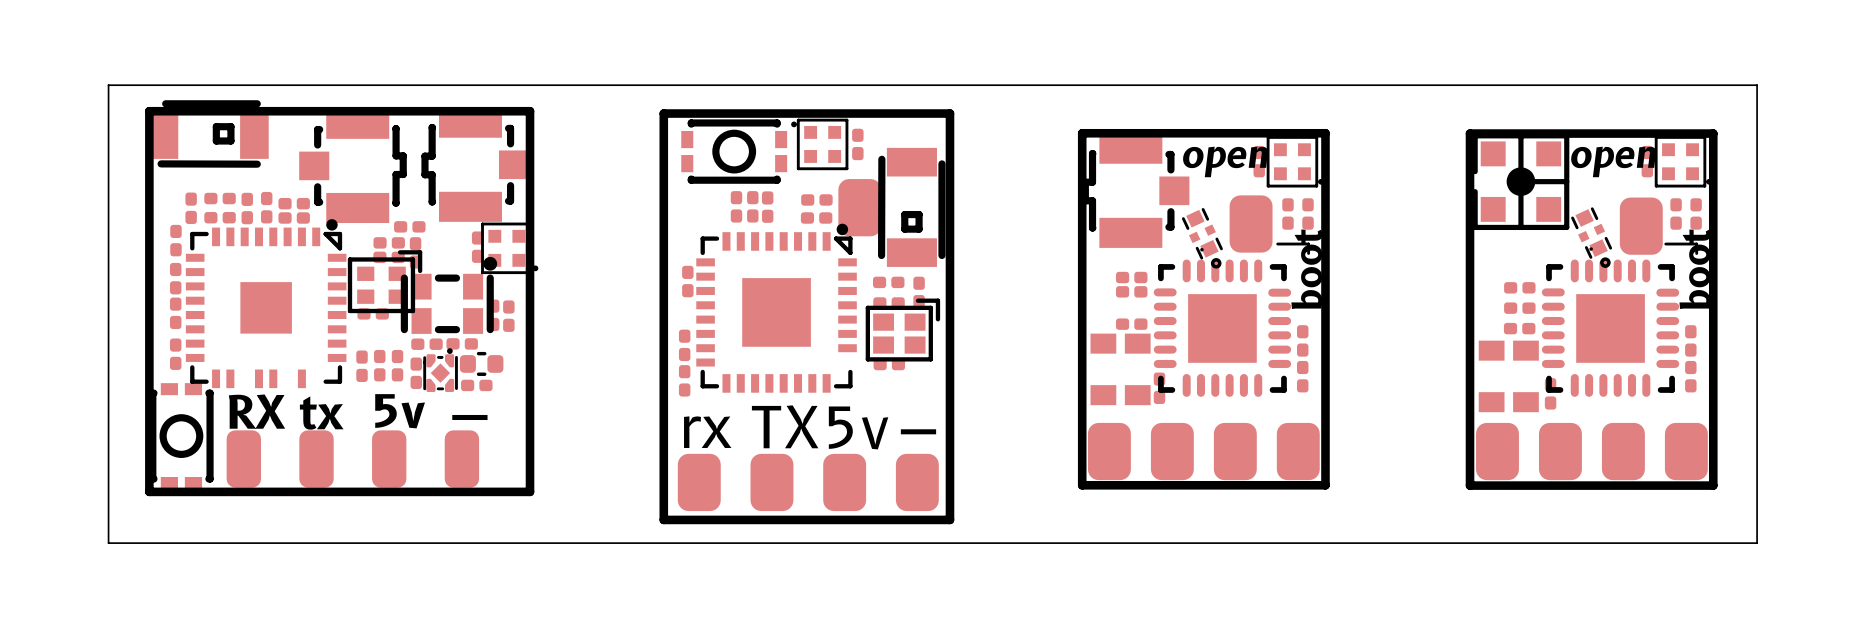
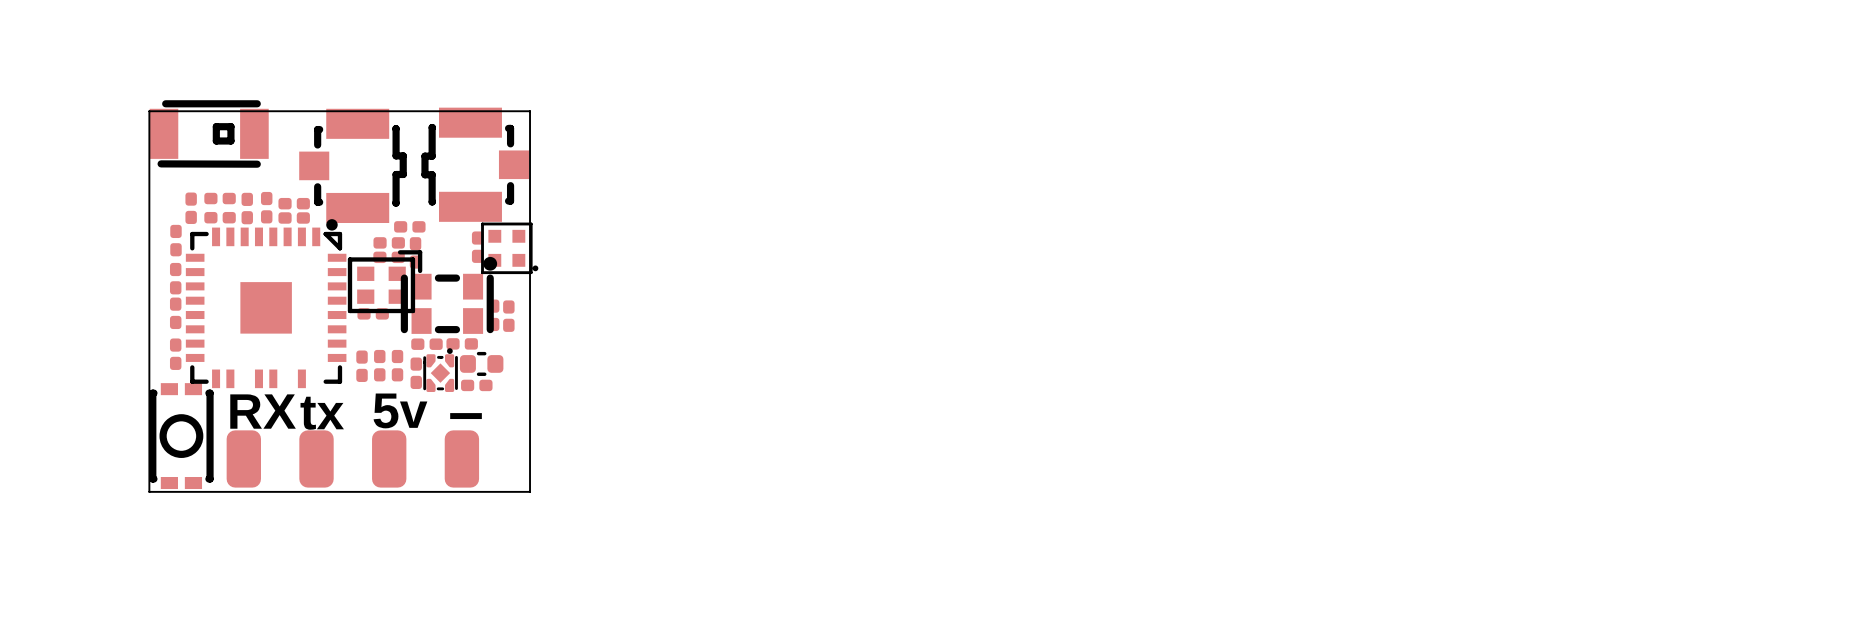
board edge: (108, 85) (1757, 85) (1757, 543) (108, 543) (108, 85) -> none
line: (149, 111) (530, 111) (530, 491) (149, 491) (149, 111) -> none
board edge: none -> (149, 111) (530, 111) (530, 491) (149, 491) (149, 111)
line: (663, 113) (949, 113) (949, 519) (663, 519) (663, 113) -> none
line: (1082, 133) (1325, 133) (1325, 485) (1082, 485) (1082, 133) -> none
line: (1470, 133) (1713, 133) (1713, 485) (1470, 485) (1470, 133) -> none
part: (819, 144) -> none
part: (857, 144) -> none
part: (734, 151) -> none
text: open (1225, 161) -> none
part: (1259, 161) -> none
part: (1295, 161) -> none
text: open (1613, 161) -> none
part: (1647, 161) -> none
part: (1683, 161) -> none
part: (1520, 181) -> none
part: (1135, 190) -> none
part: (816, 199) -> none
part: (736, 206) -> none
part: (752, 206) -> none
part: (767, 207) -> none
part: (859, 207) -> none
part: (911, 207) -> none
part: (1287, 213) -> none
part: (1308, 213) -> none
part: (1676, 213) -> none
part: (1696, 213) -> none
part: (816, 217) -> none
part: (1251, 224) -> none
part: (1641, 226) -> none
part: (1591, 237) -> none
part: (1202, 238) -> none
line: (1277, 244) (1308, 244) (1308, 253) -> none
line: (1665, 244) (1696, 244) (1696, 253) -> none
text: boot (1306, 269) -> none
text: boot (1694, 269) -> none
part: (1131, 277) -> none
part: (687, 281) -> none
part: (888, 282) -> none
part: (1519, 287) -> none
part: (1131, 291) -> none
part: (919, 292) -> none
part: (889, 302) -> none
part: (776, 308) -> none
part: (1519, 308) -> none
part: (1131, 324) -> none
part: (1222, 328) -> none
part: (1519, 328) -> none
part: (1610, 328) -> none
part: (902, 330) -> none
part: (1302, 340) -> none
part: (1690, 340) -> none
part: (684, 345) -> none
part: (889, 364) -> none
part: (1120, 369) -> none
part: (1302, 376) -> none
part: (1508, 376) -> none
part: (1690, 376) -> none
part: (684, 380) -> none
part: (1159, 388) -> none
part: (1550, 393) -> none
text: TX (785, 426) -> none
text: 5v (858, 427) -> none
text: - (918, 431) -> none
text: rx (707, 432) -> none
part: (1109, 451) -> none
part: (1172, 451) -> none
part: (1235, 451) -> none
part: (1298, 451) -> none
part: (1497, 451) -> none
part: (1560, 451) -> none
part: (1623, 451) -> none
part: (1686, 451) -> none
part: (699, 482) -> none
part: (771, 482) -> none
part: (844, 482) -> none
part: (917, 482) -> none

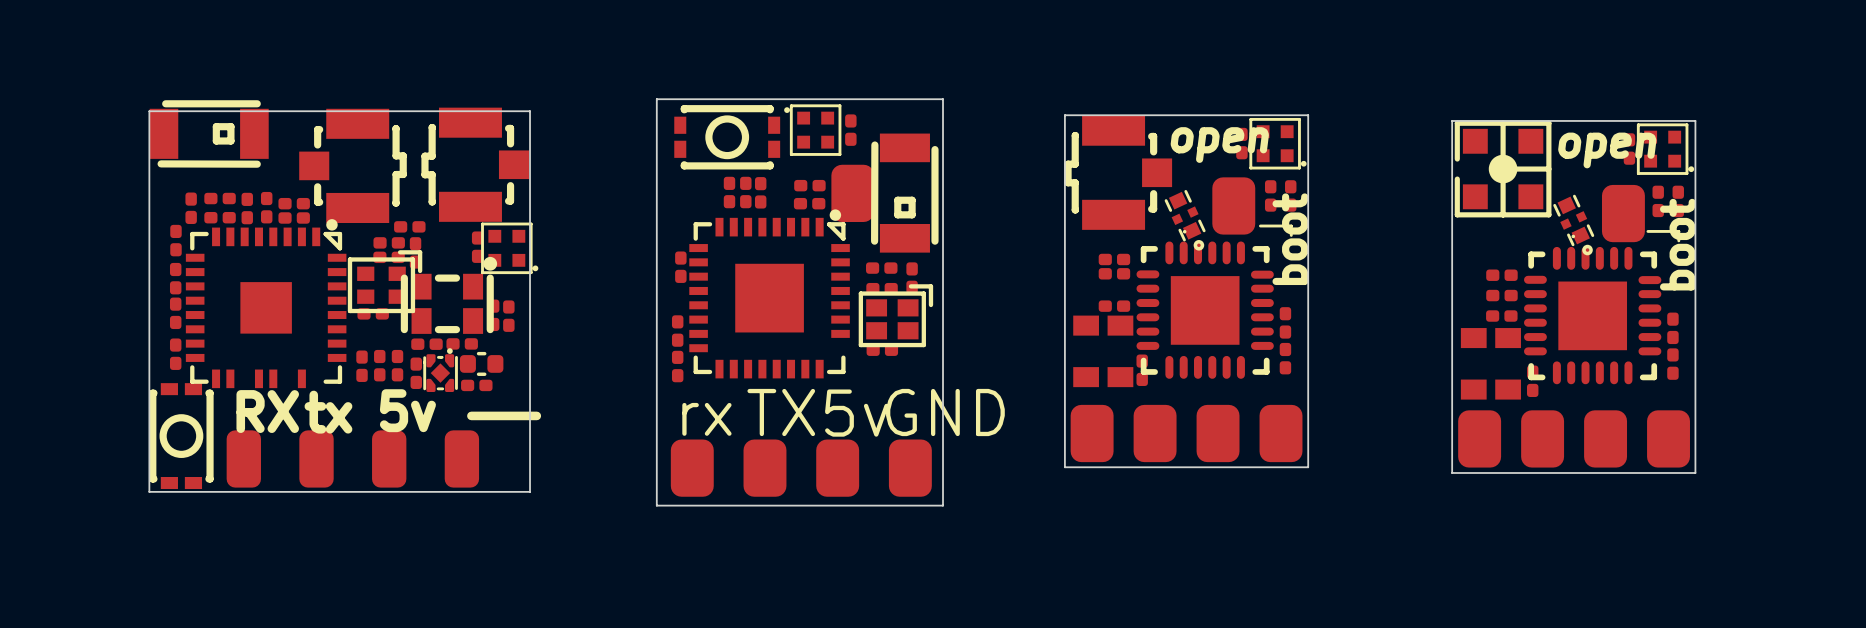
board edge: none -> (656, 99) (943, 99) (943, 505) (656, 505) (656, 99)
board edge: none -> (1064, 115) (1308, 115) (1308, 467) (1064, 467) (1064, 115)
board edge: none -> (1452, 120) (1695, 120) (1695, 472) (1452, 472) (1452, 120)
part: none -> (812, 130)
part: none -> (850, 130)
part: none -> (727, 137)
text: none -> open (1219, 145)
part: none -> (1241, 143)
part: none -> (1278, 143)
text: none -> open (1607, 150)
part: none -> (1629, 149)
part: none -> (1665, 149)
part: none -> (1503, 169)
part: none -> (1118, 172)
part: none -> (809, 185)
part: none -> (729, 192)
part: none -> (745, 192)
part: none -> (760, 192)
part: none -> (852, 193)
part: none -> (904, 193)
part: none -> (1270, 195)
part: none -> (1290, 195)
part: none -> (1658, 201)
part: none -> (1678, 201)
part: none -> (809, 203)
part: none -> (1233, 205)
part: none -> (1623, 213)
part: none -> (1185, 220)
part: none -> (1573, 225)
line: none -> (1260, 226) (1291, 226) (1291, 235)
line: none -> (1647, 231) (1678, 231) (1678, 240)
text: none -> boot (1290, 239)
text: none -> boot (1677, 244)
part: none -> (1114, 259)
part: none -> (680, 267)
part: none -> (881, 268)
part: none -> (1114, 273)
part: none -> (1501, 275)
part: none -> (912, 278)
part: none -> (882, 288)
part: none -> (769, 293)
part: none -> (1501, 295)
part: none -> (1114, 306)
part: none -> (1205, 310)
part: none -> (895, 315)
part: none -> (1592, 315)
part: none -> (1501, 316)
part: none -> (1285, 322)
part: none -> (1672, 328)
part: none -> (677, 331)
part: none -> (882, 350)
part: none -> (1103, 351)
part: none -> (1285, 358)
part: none -> (1490, 363)
part: none -> (1672, 364)
part: none -> (677, 366)
part: none -> (1142, 370)
part: none -> (1532, 381)
text: none -> TX (781, 412)
text: none -> GND (945, 412)
text: none -> 5v (856, 413)
text: none -> rx (706, 419)
part: none -> (1092, 433)
part: none -> (1155, 433)
part: none -> (1218, 433)
part: none -> (1281, 433)
part: none -> (1479, 438)
part: none -> (1542, 438)
part: none -> (1605, 438)
part: none -> (1668, 438)
part: none -> (692, 468)
part: none -> (764, 468)
part: none -> (837, 468)
part: none -> (910, 468)

